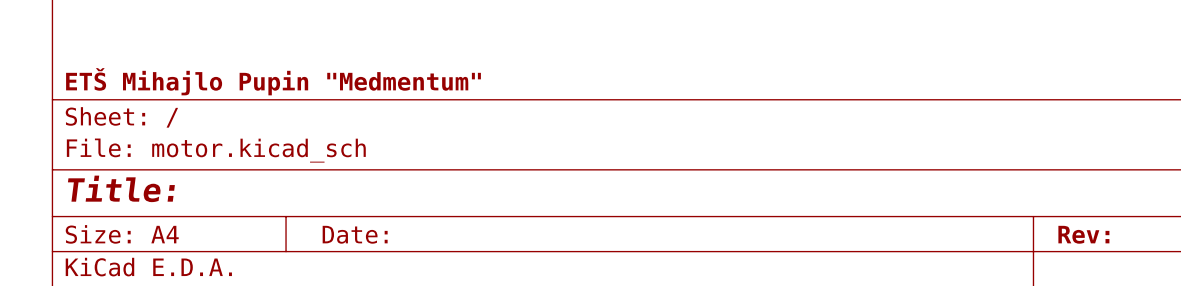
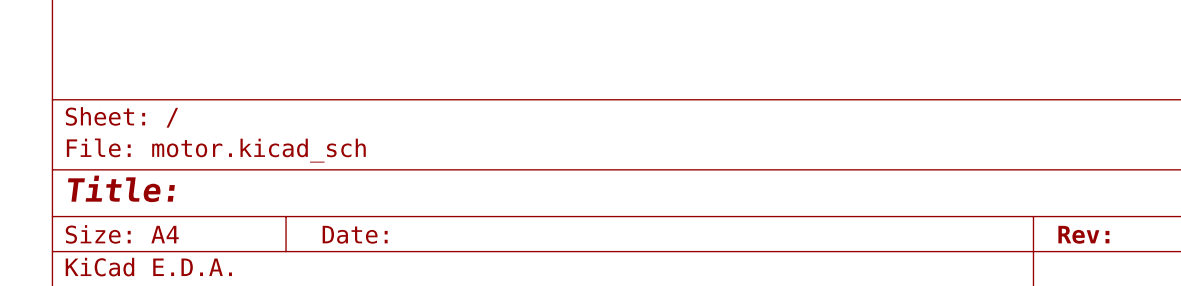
title block: ETŠ Mihajlo Pupin "Medmentum" (273, 81) -> none

